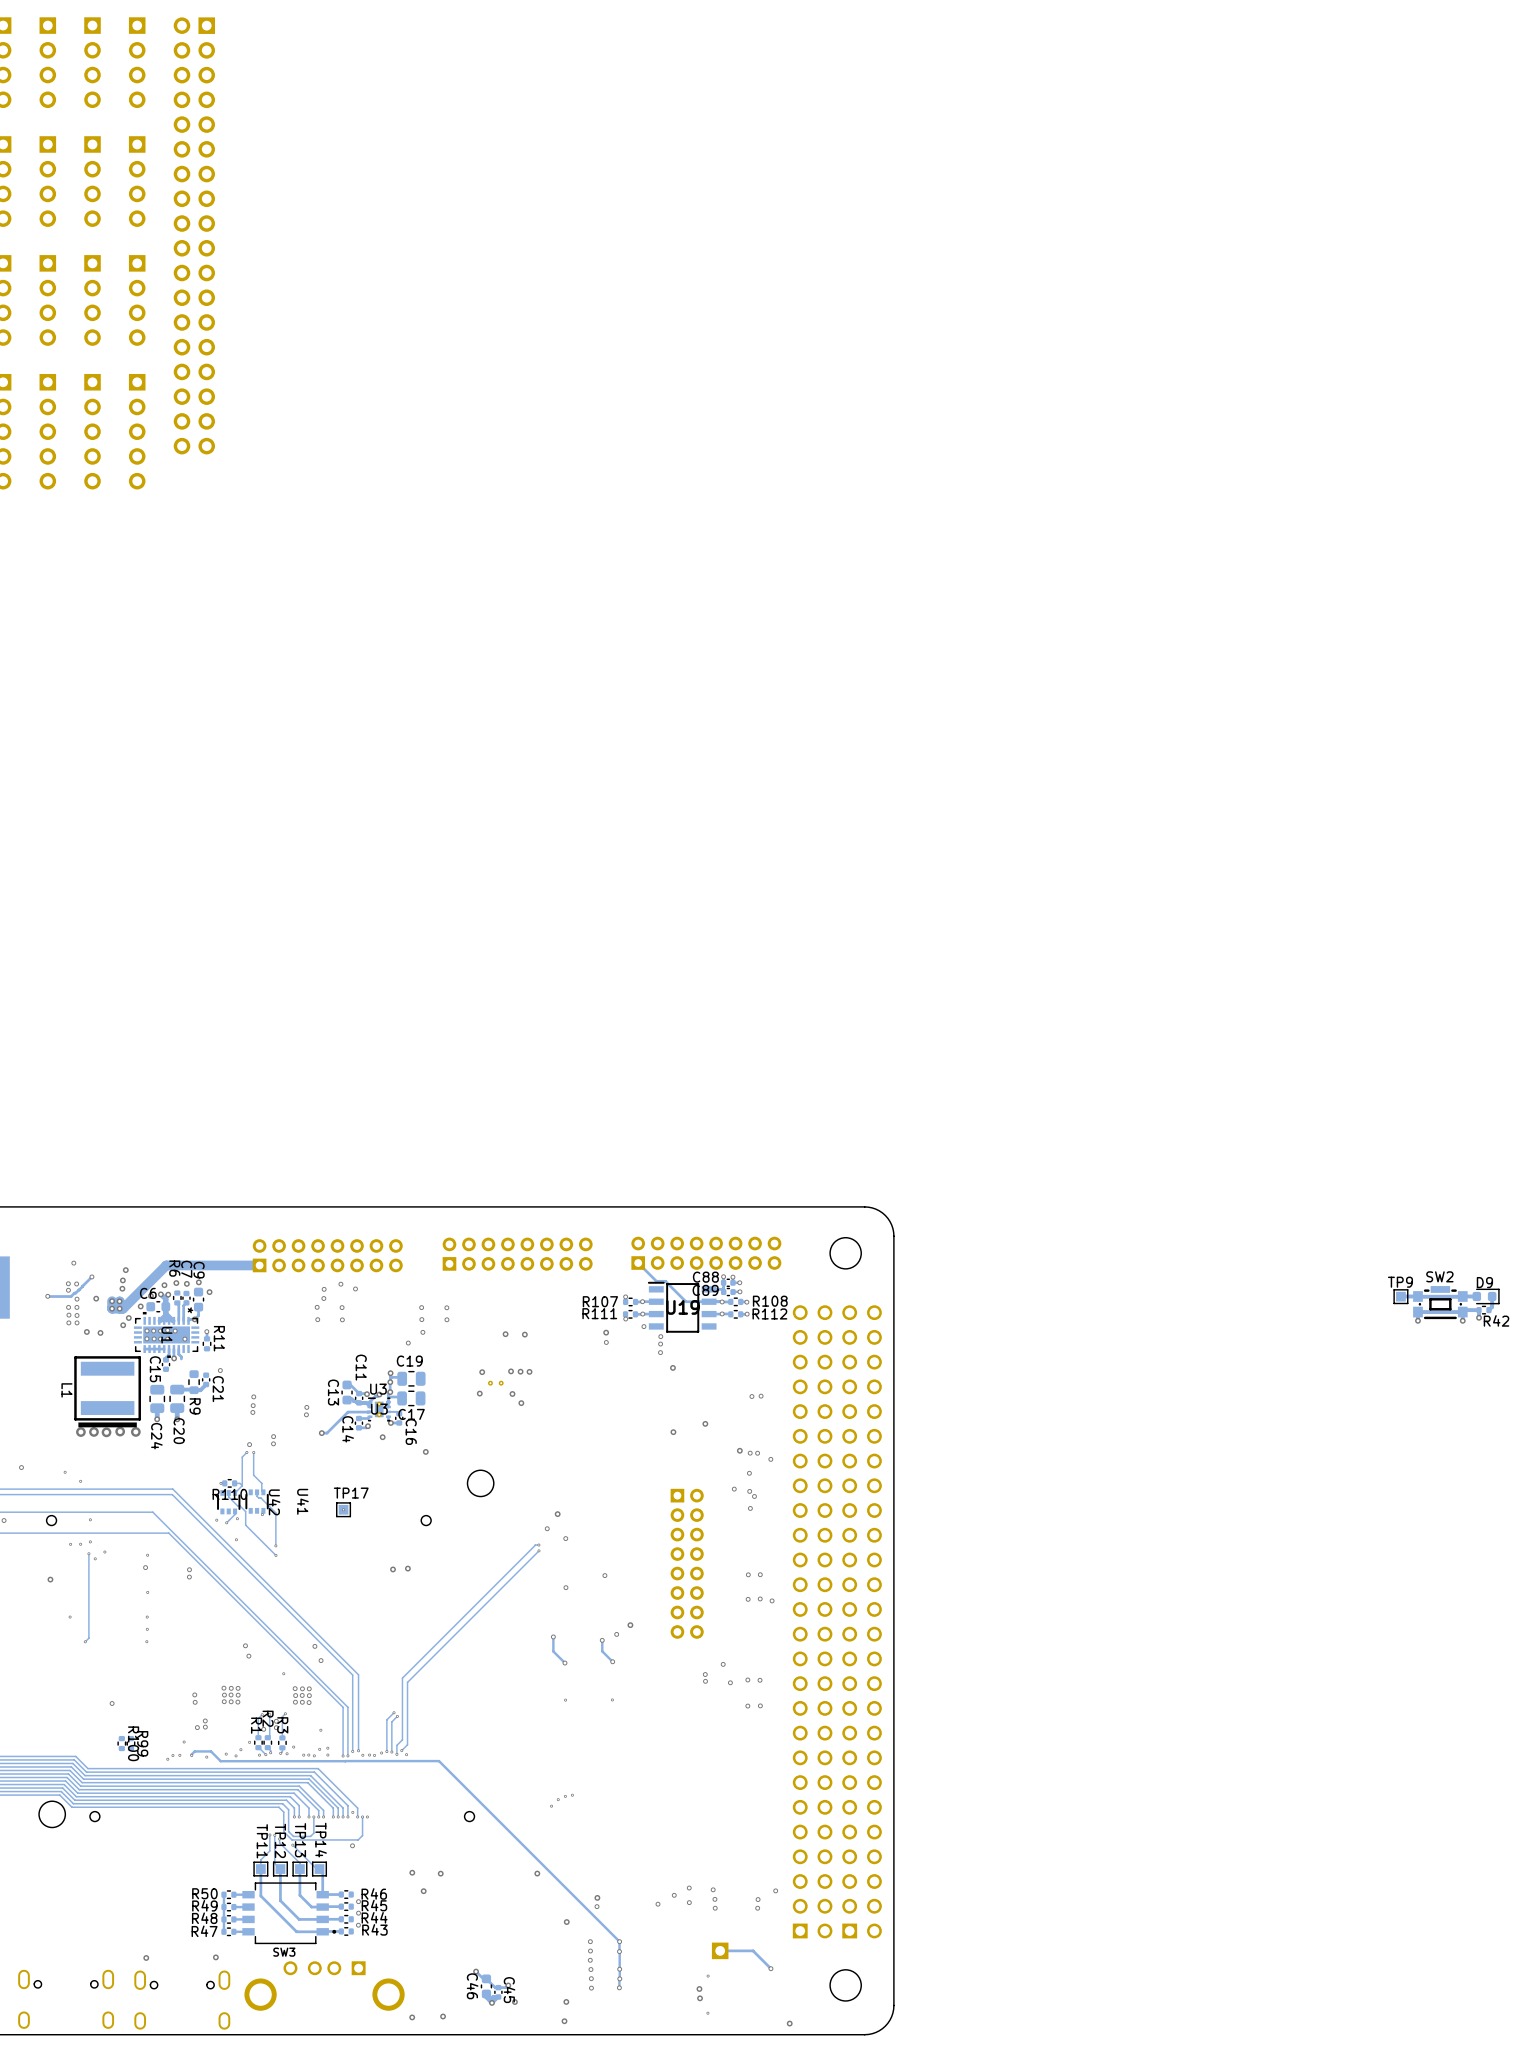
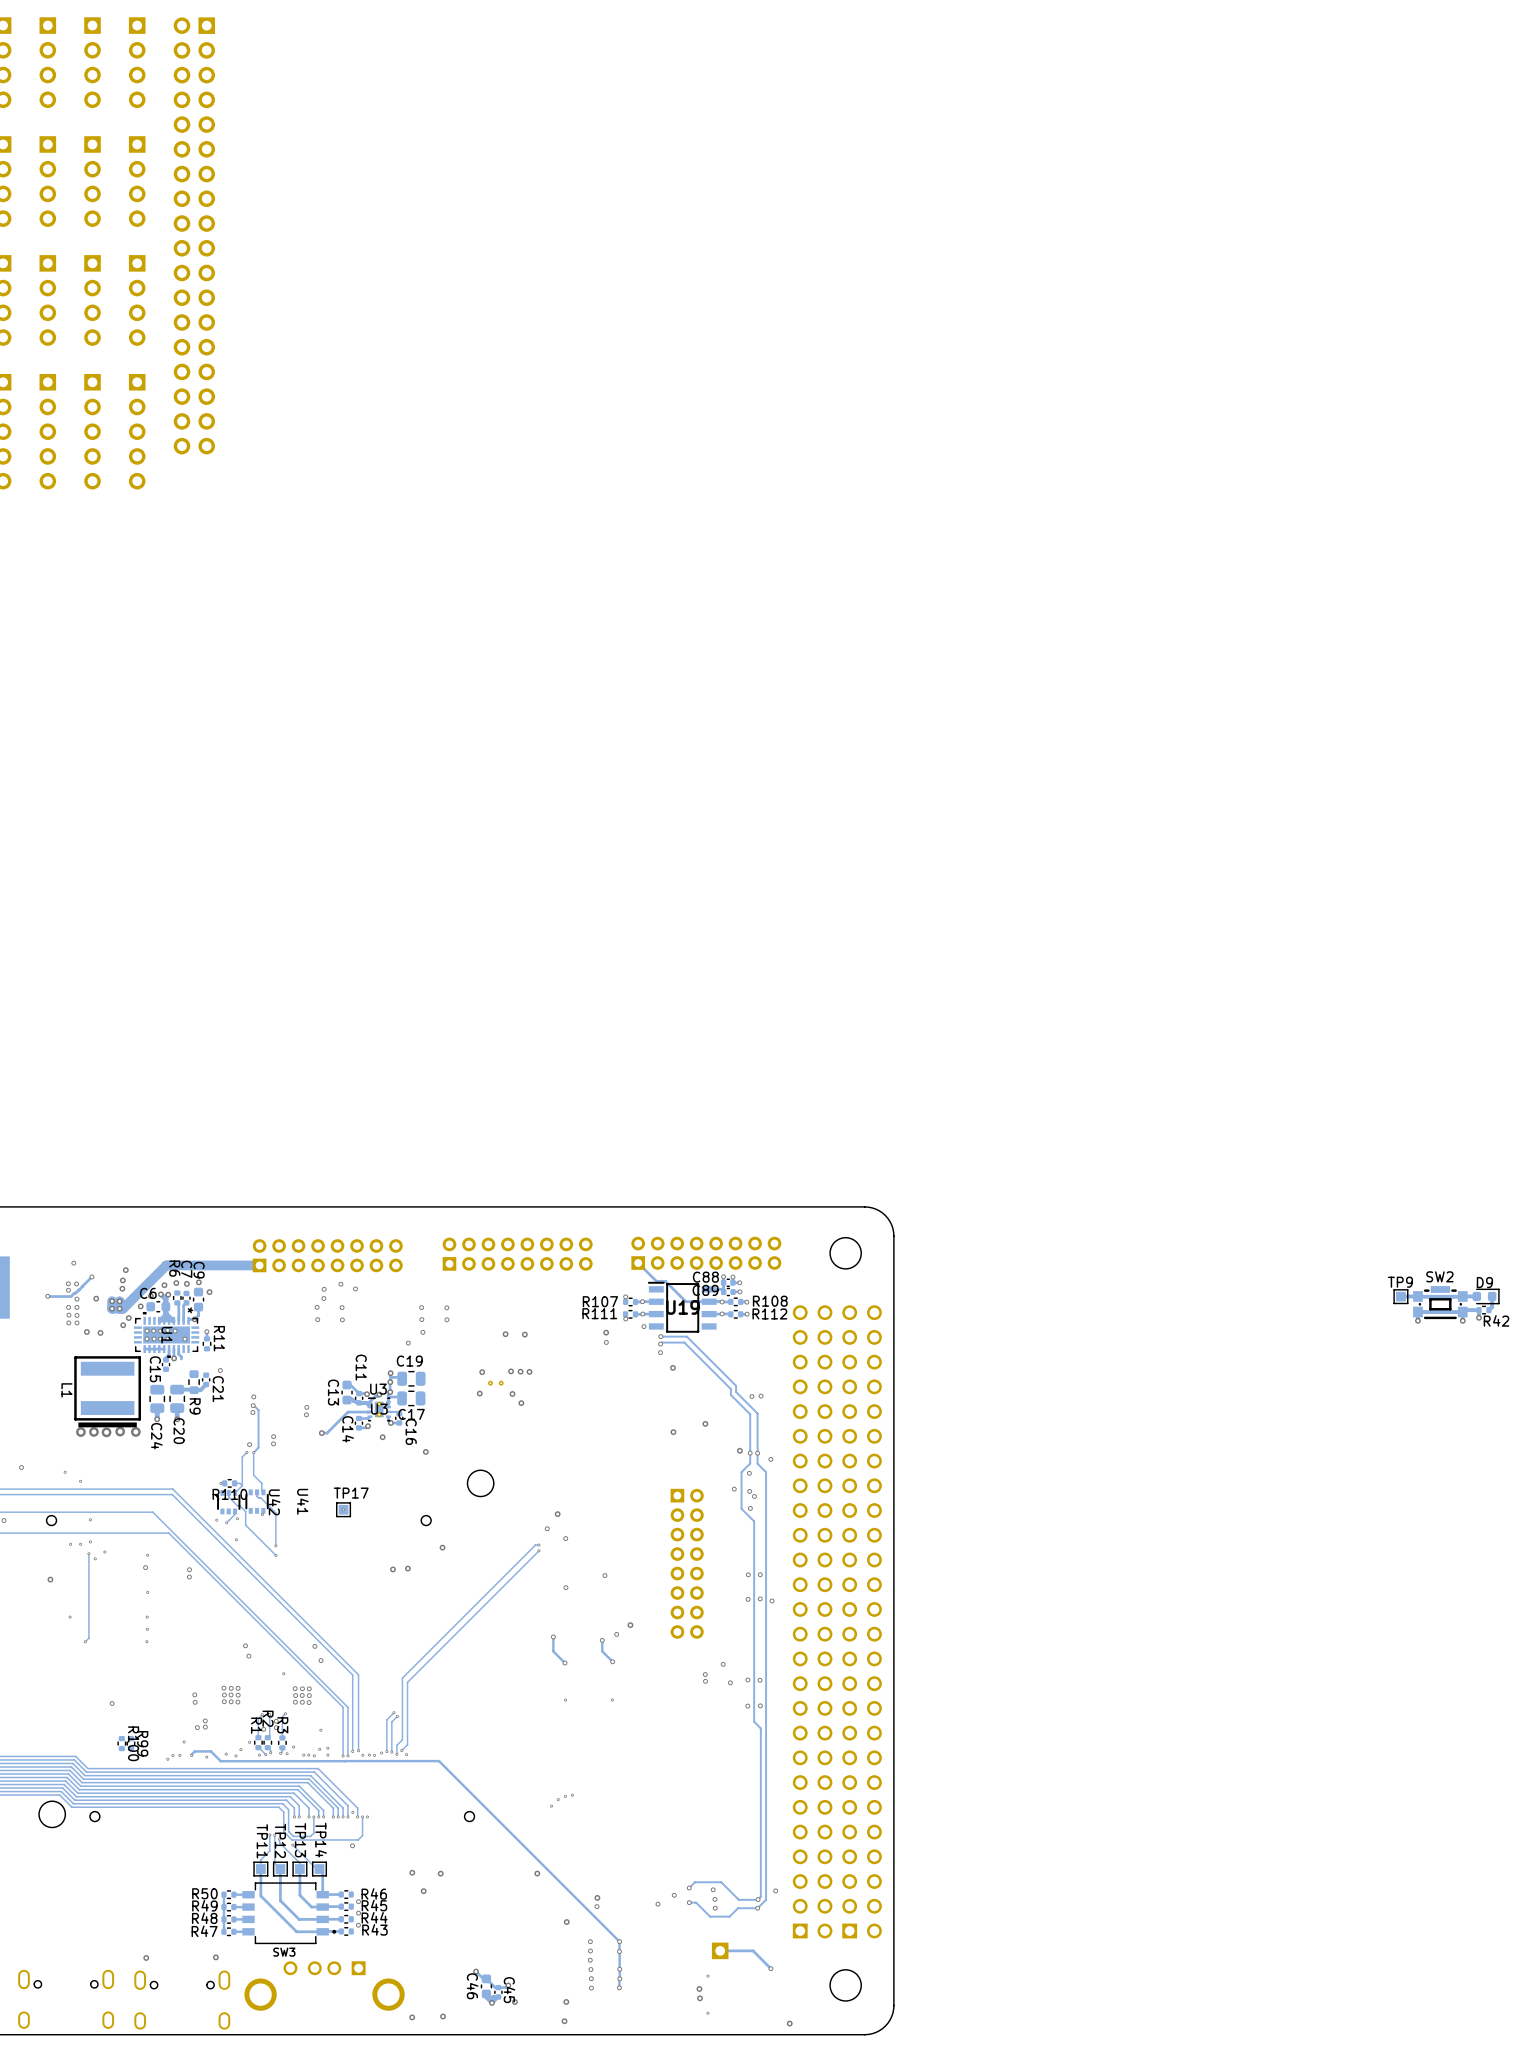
track: none -> (660, 1336) (686, 1336) (736, 1385) (736, 1392) (757, 1413) (757, 1463) (766, 1472) (766, 1899) (757, 1908) (738, 1908) (729, 1916) (710, 1916) (696, 1902) (689, 1902)
track: none -> (660, 1344) (684, 1342) (730, 1389) (730, 1395) (750, 1414) (750, 1463) (741, 1472) (741, 1508) (754, 1521) (754, 1721) (760, 1728) (760, 1896) (757, 1899) (738, 1899) (721, 1882) (695, 1882) (689, 1888)
track: none -> (253, 1405) (258, 1410) (258, 1447) (253, 1452)
via: none -> (442, 1547)

